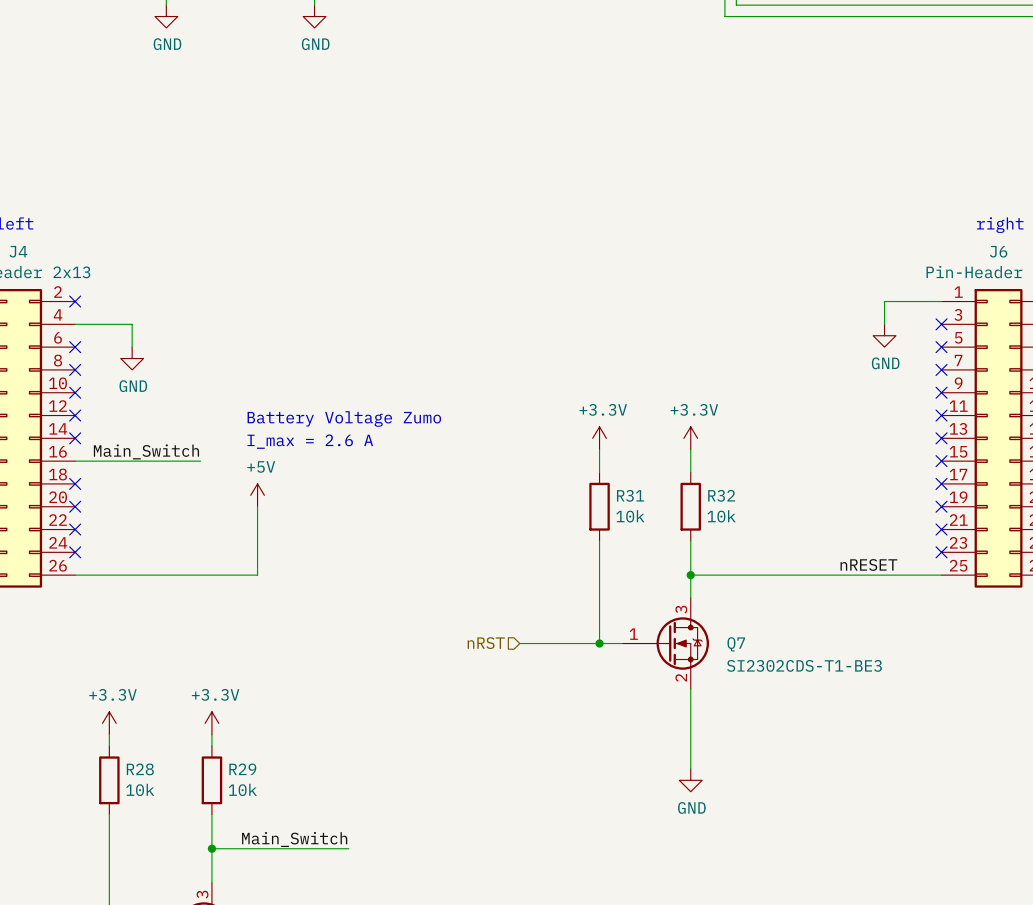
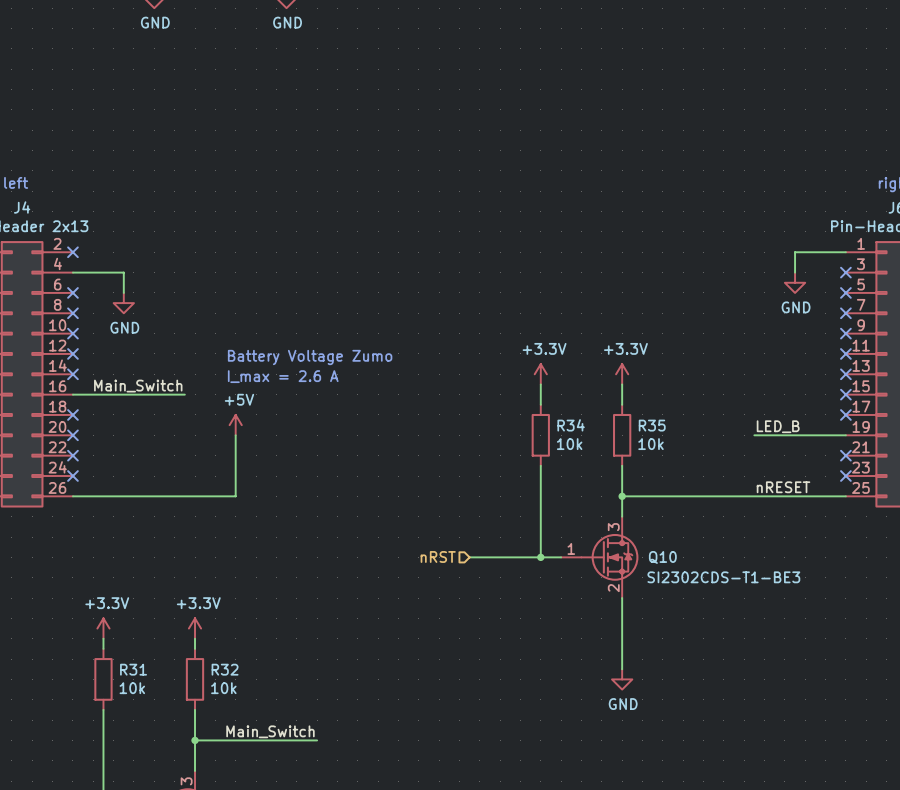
R31 name: R31 (630, 495) -> R34 (571, 425)
R32 name: R32 (721, 495) -> R35 (652, 425)
label: none -> LED_B (778, 426)
wire: none -> (754, 435) (845, 435)
no-connect mark: (941, 506) -> none
Q7 name: Q7 (736, 644) -> Q10 (662, 557)
R28 name: R28 (140, 769) -> R31 (133, 669)
R29 name: R29 (242, 769) -> R32 (225, 669)

